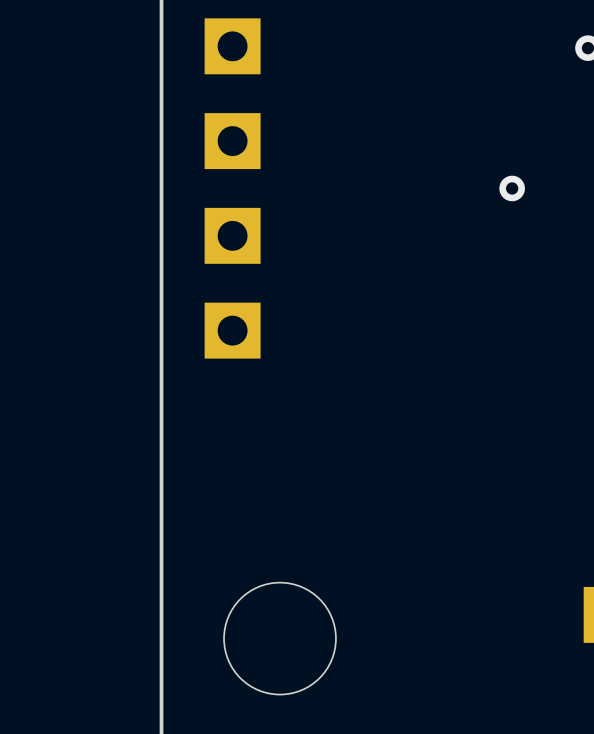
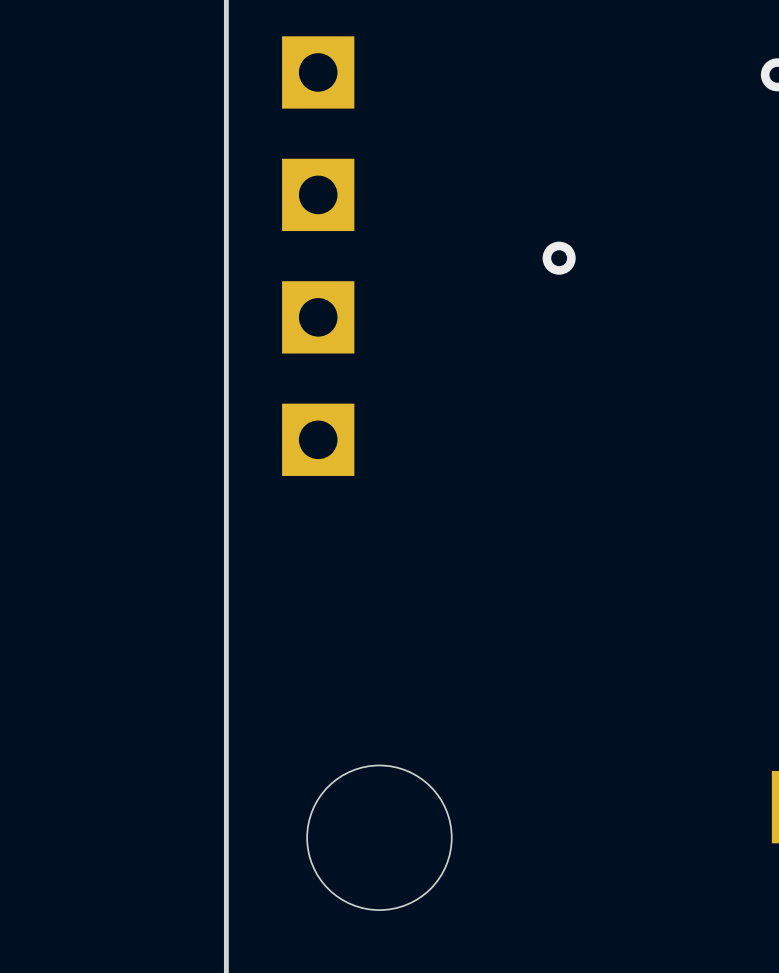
via position: (512, 188) -> (559, 258)

